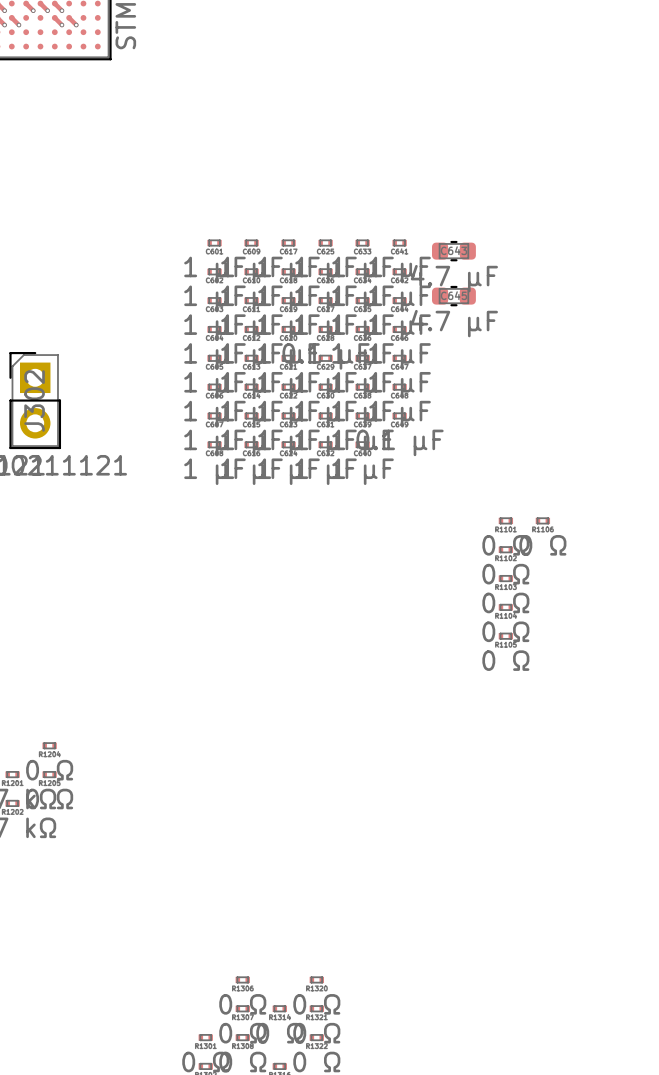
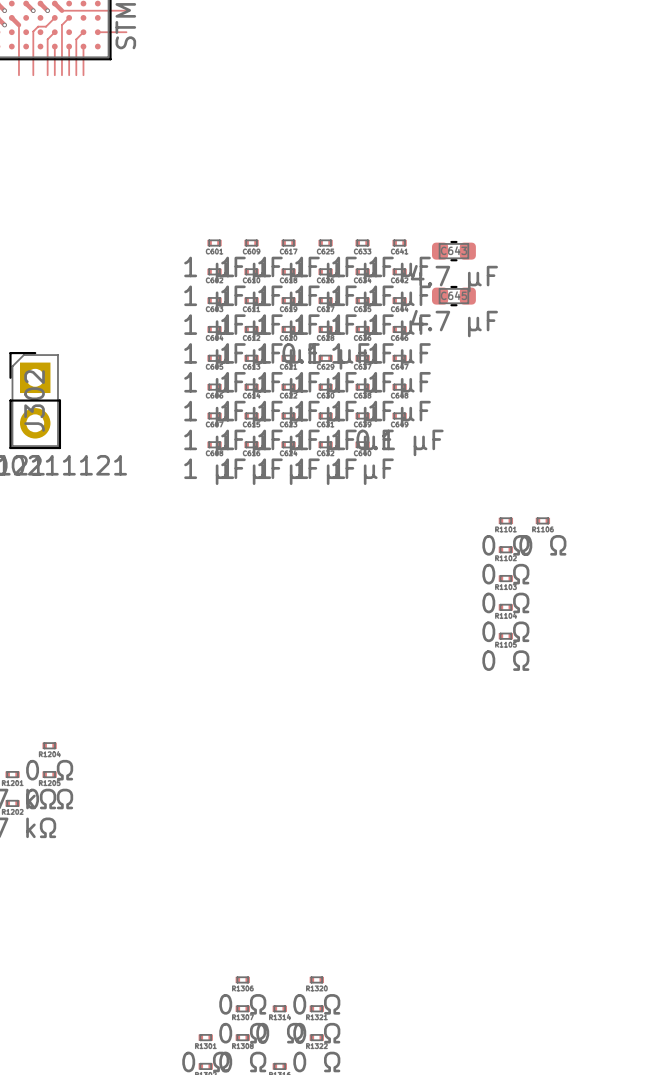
track: none -> (61, 10) (126, 10)
via: (61, 10) -> none
track: (54, 17) (61, 25) -> (54, 17) (46, 26) (38, 26) (33, 31) (33, 75)
track: (69, 17) (76, 25) -> (69, 17) (61, 25) (61, 75)
track: none -> (18, 25) (18, 75)
via: (18, 25) -> none
via: (61, 25) -> none
via: (76, 25) -> none
track: none -> (54, 32) (47, 39) (47, 75)
track: none -> (83, 32) (76, 39) (76, 75)
track: none -> (97, 32) (126, 32)
track: none -> (54, 46) (54, 75)
track: none -> (69, 46) (69, 75)
track: none -> (83, 46) (83, 75)

